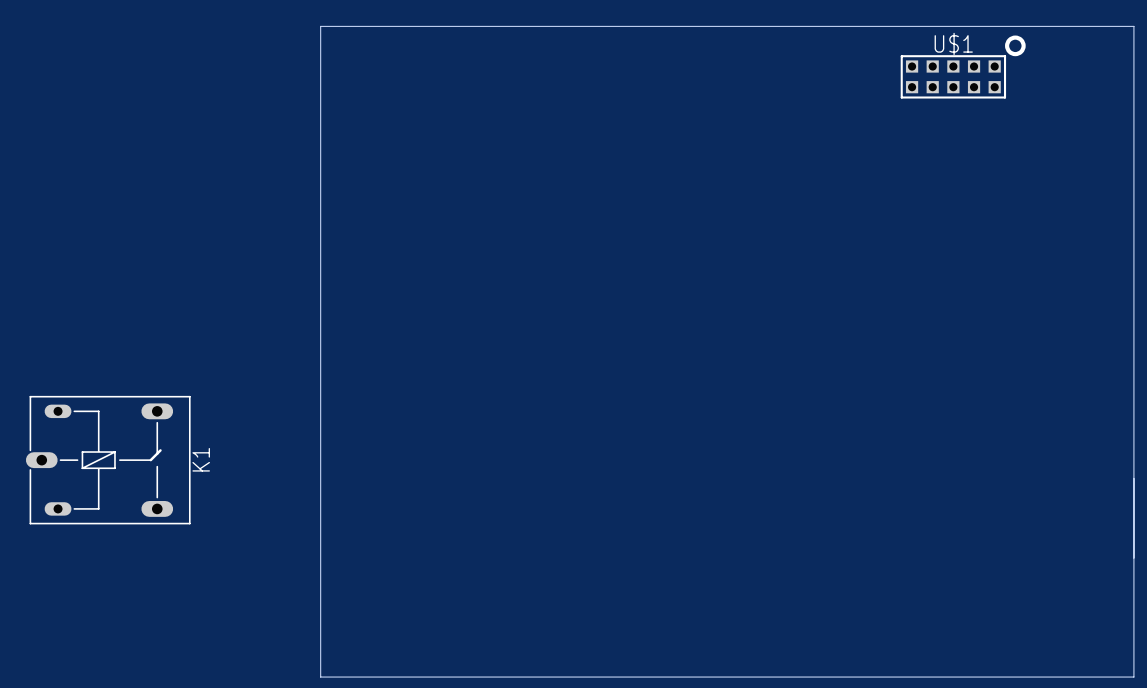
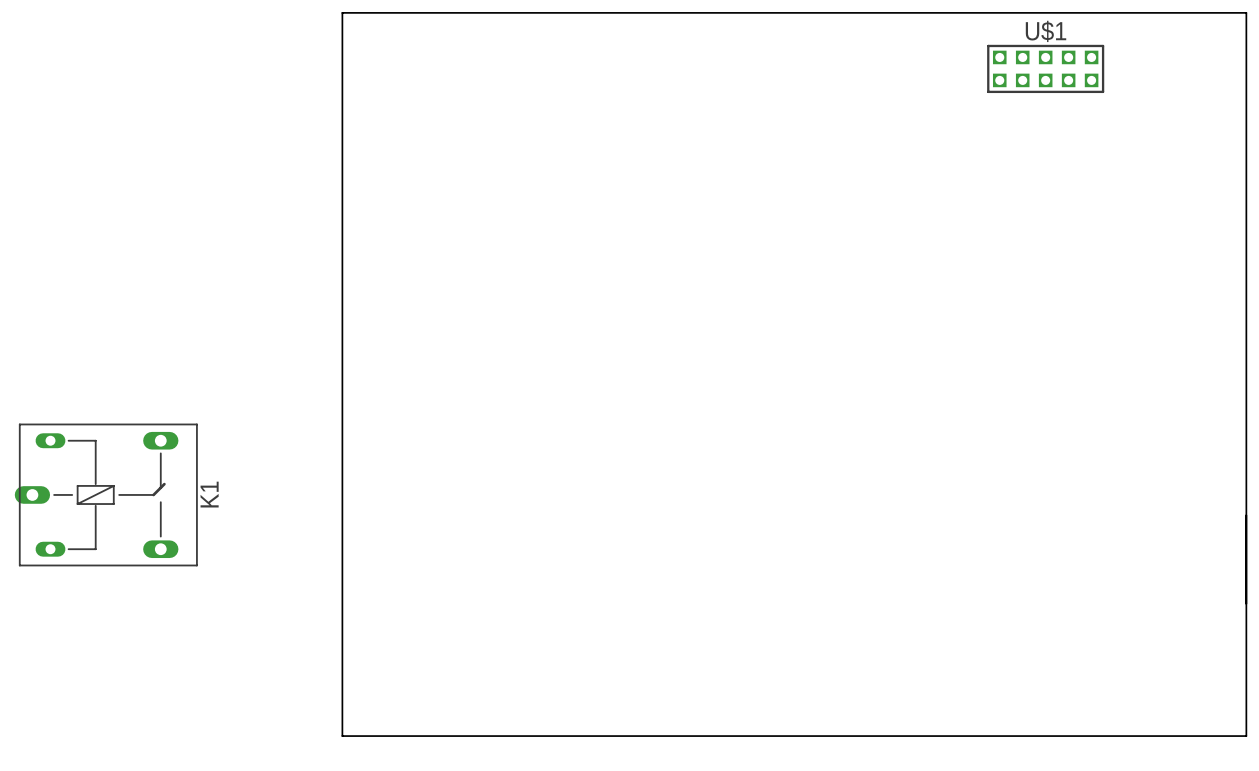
U$1 footprint: [900, 35, 1026, 99] -> [987, 44, 1105, 94]
K1 footprint: [25, 395, 191, 525] -> [14, 423, 198, 567]

